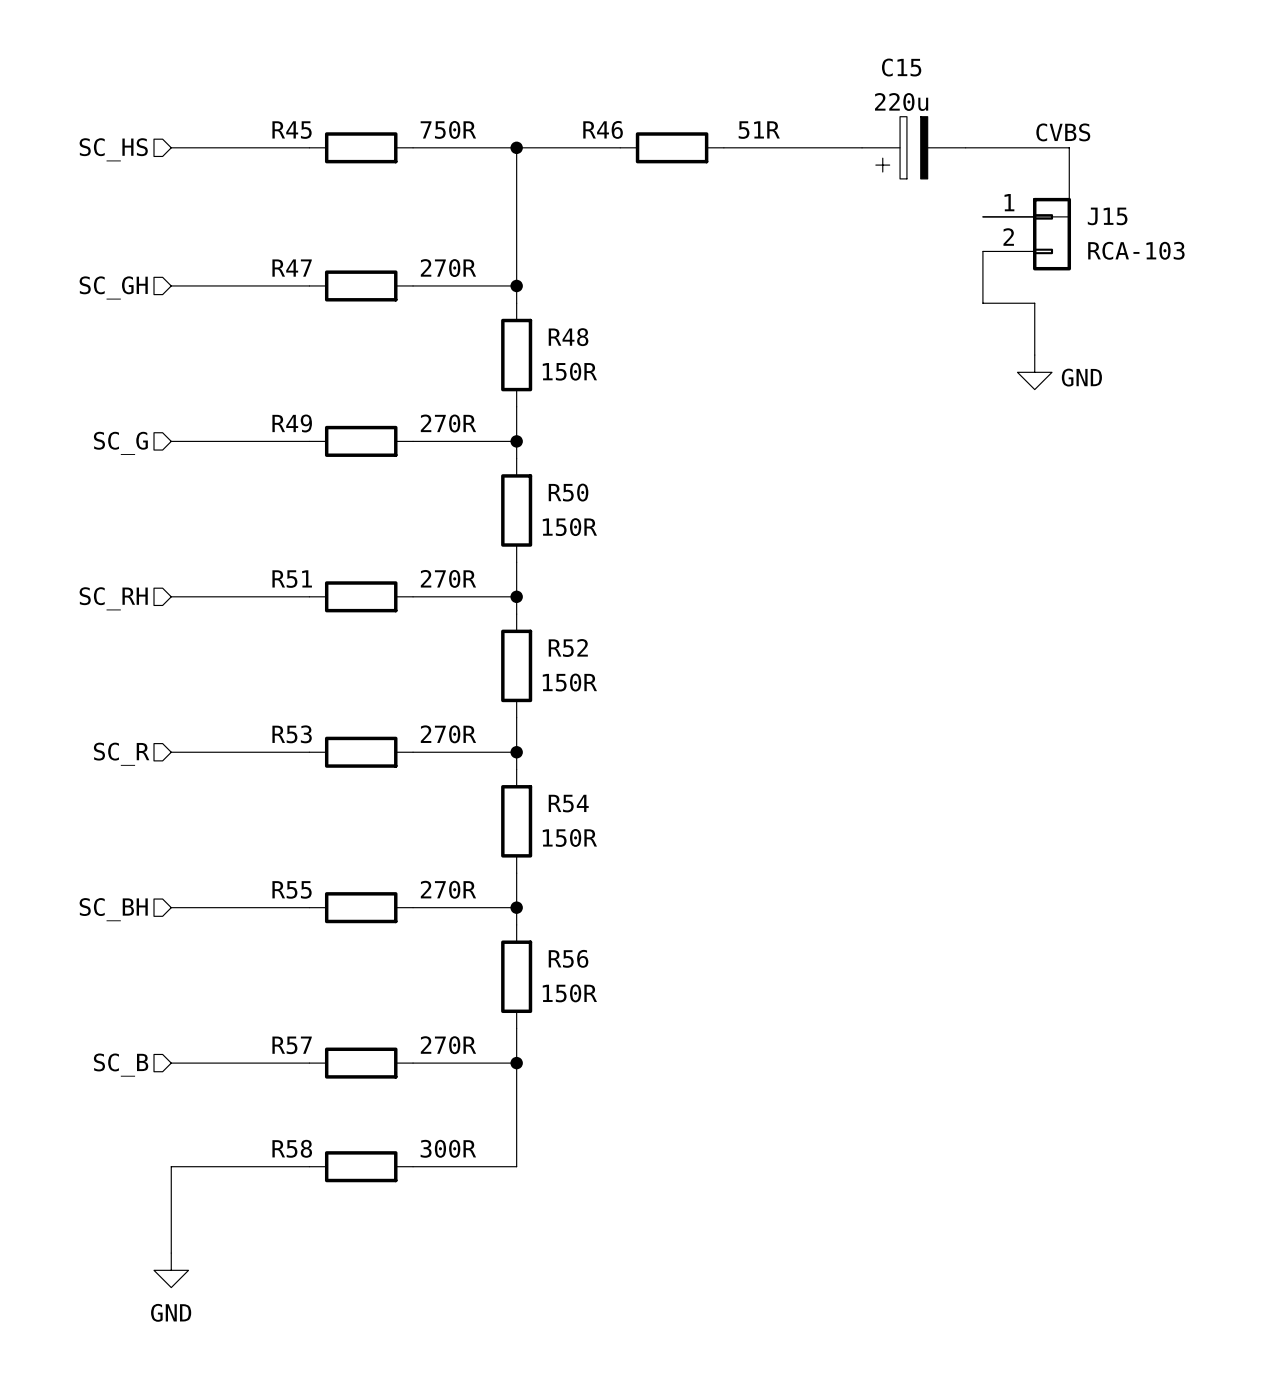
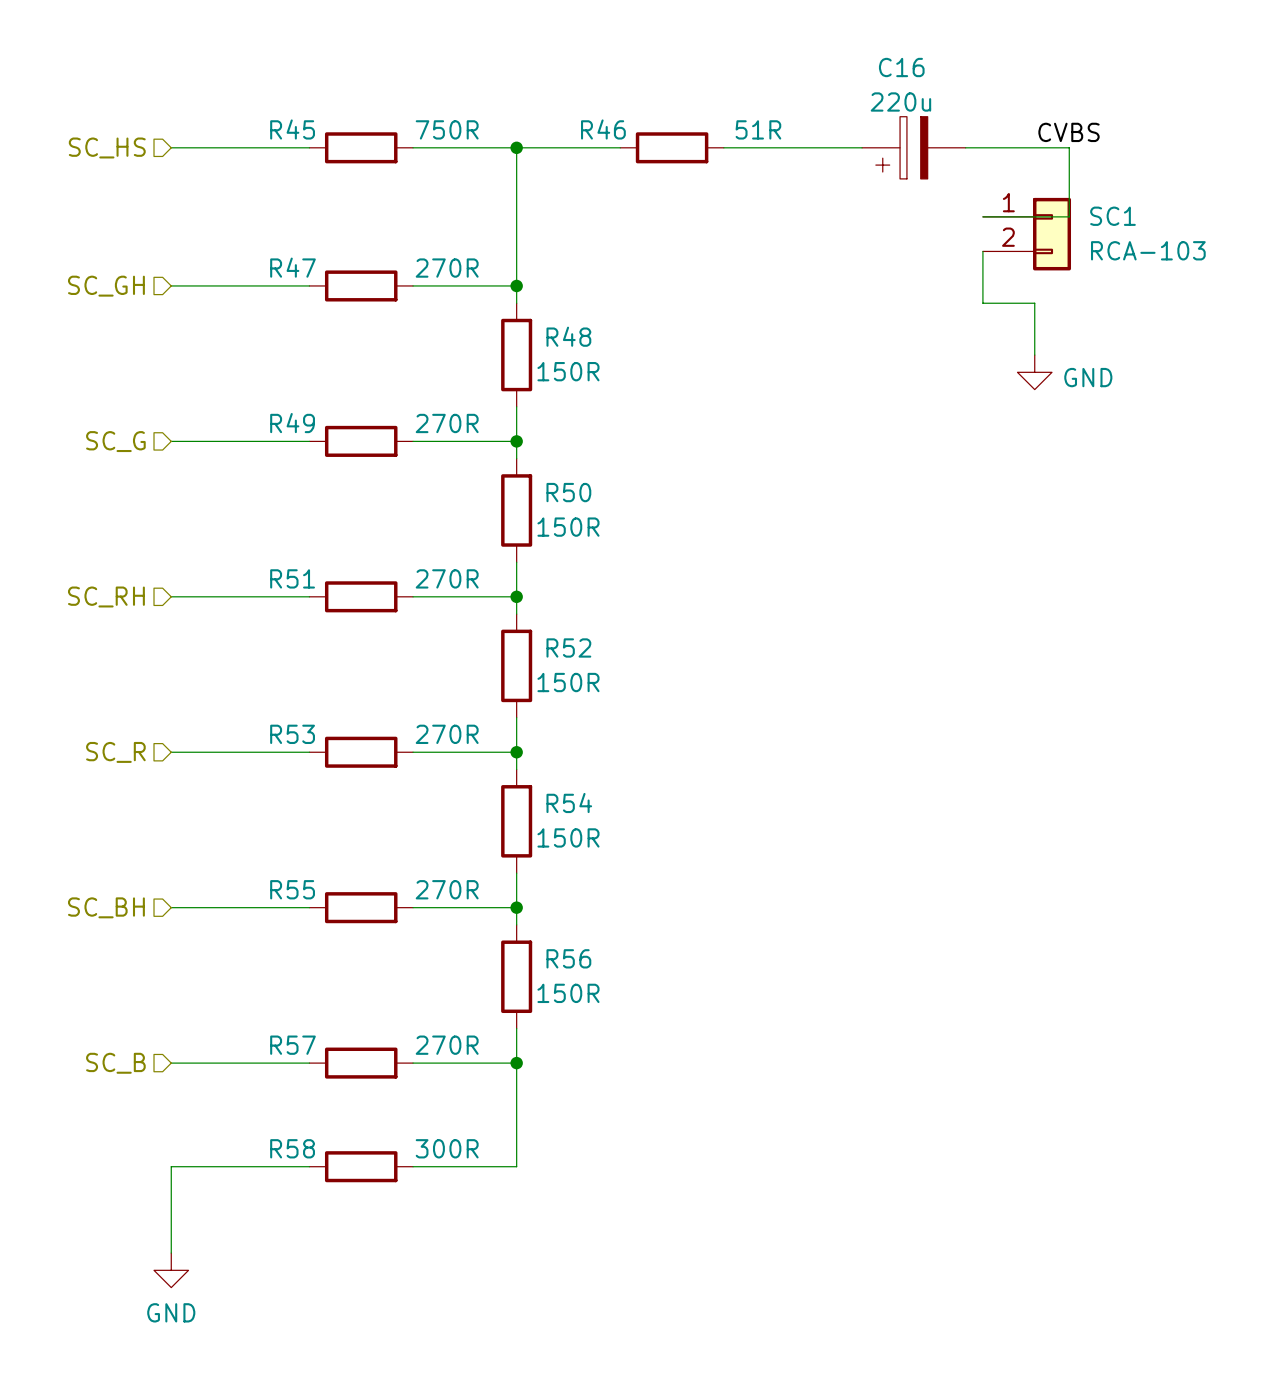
C15 name: C15 (901, 67) -> C16 (901, 67)
J15 name: J15 (1107, 216) -> SC1 (1112, 216)

